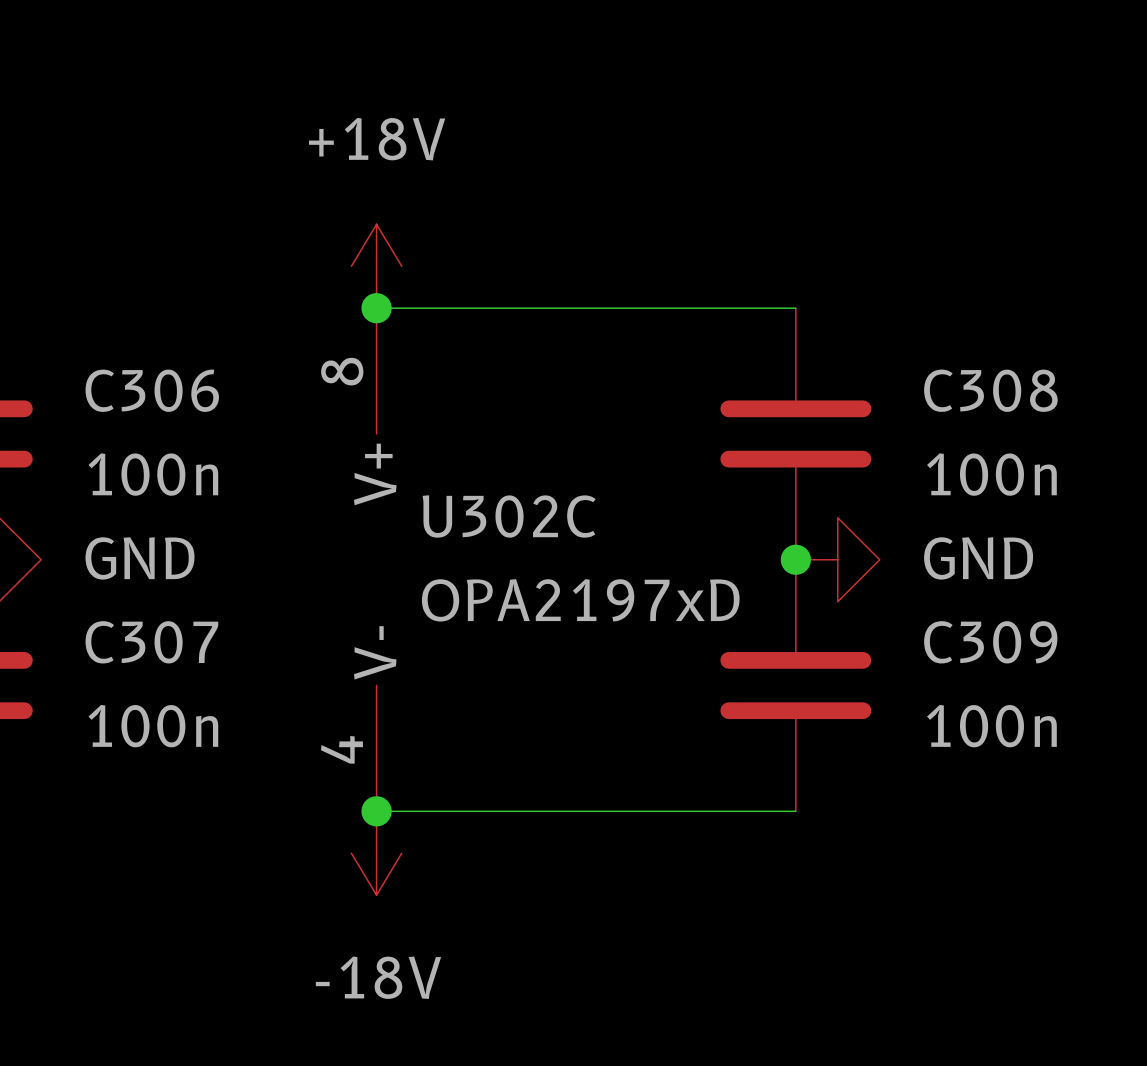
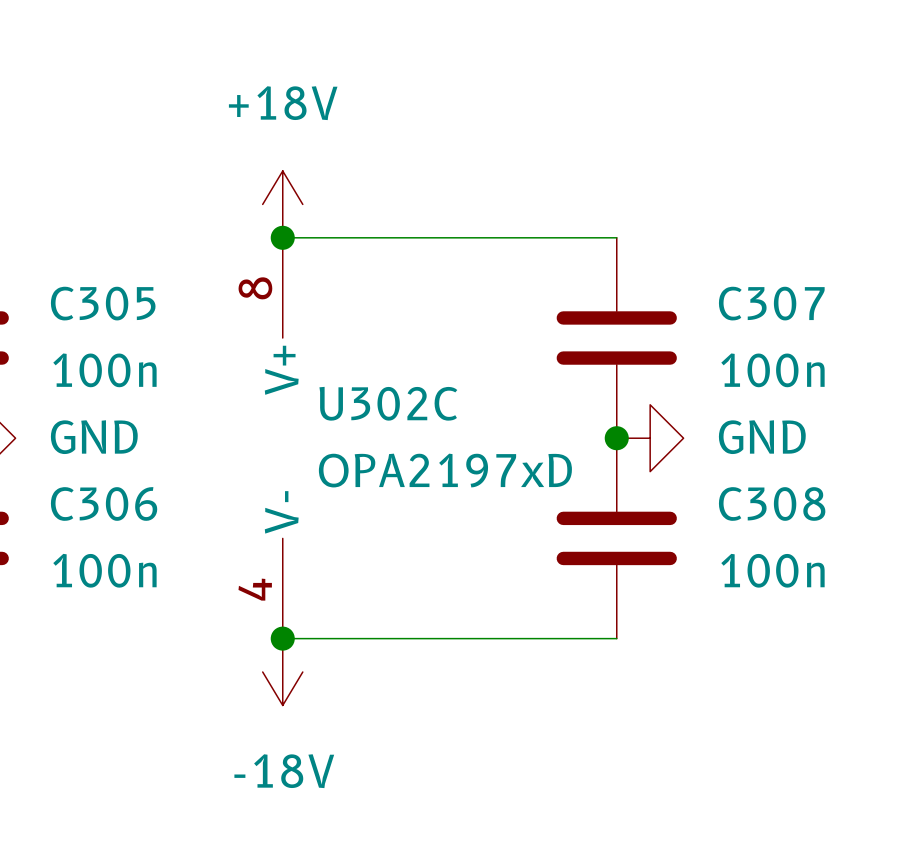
C306 name: C306 (152, 390) -> C305 (103, 303)
C308 name: C308 (990, 390) -> C307 (771, 303)
C307 name: C307 (151, 642) -> C306 (104, 503)
C309 name: C309 (990, 642) -> C308 (772, 503)

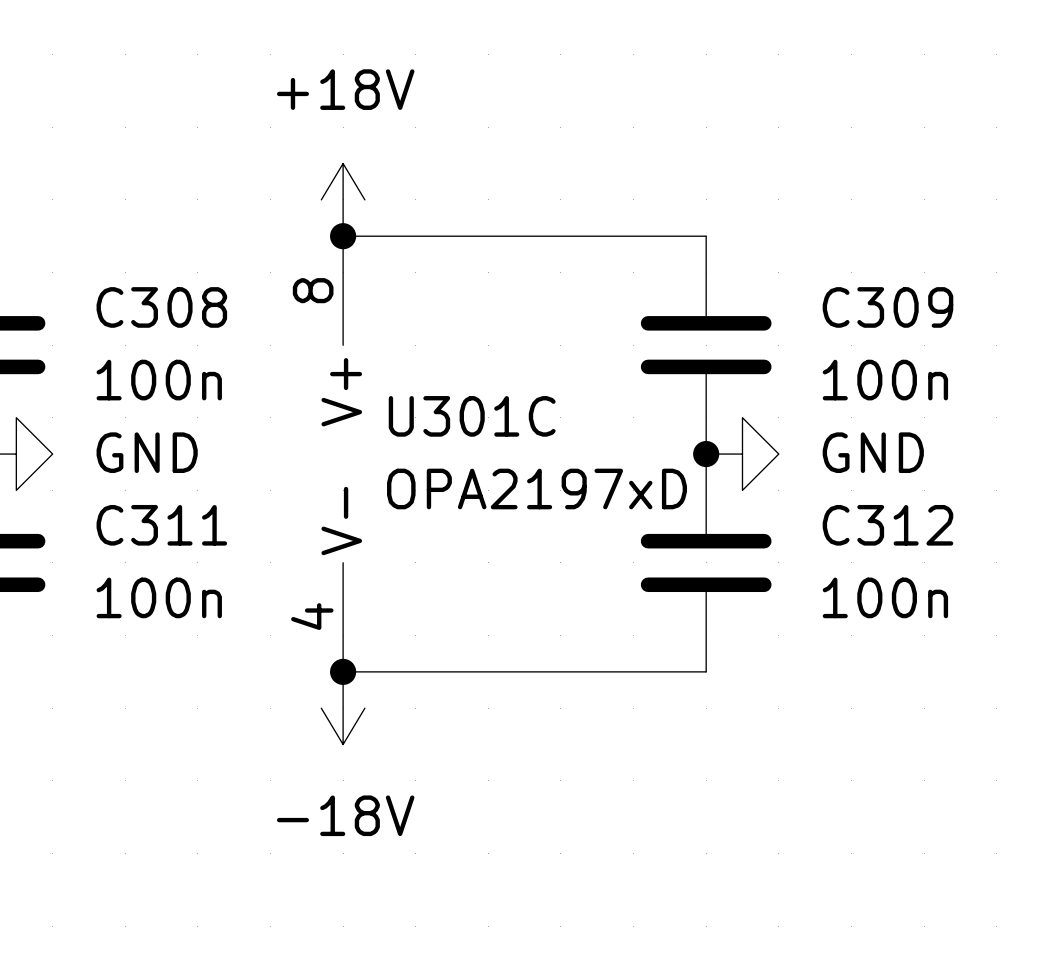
C305 name: C305 (103, 303) -> C308 (161, 307)
C307 name: C307 (771, 303) -> C309 (887, 307)
U302C name: U302C (388, 403) -> U301C (472, 416)
C306 name: C306 (104, 503) -> C311 (161, 525)
C308 name: C308 (772, 503) -> C312 (887, 525)

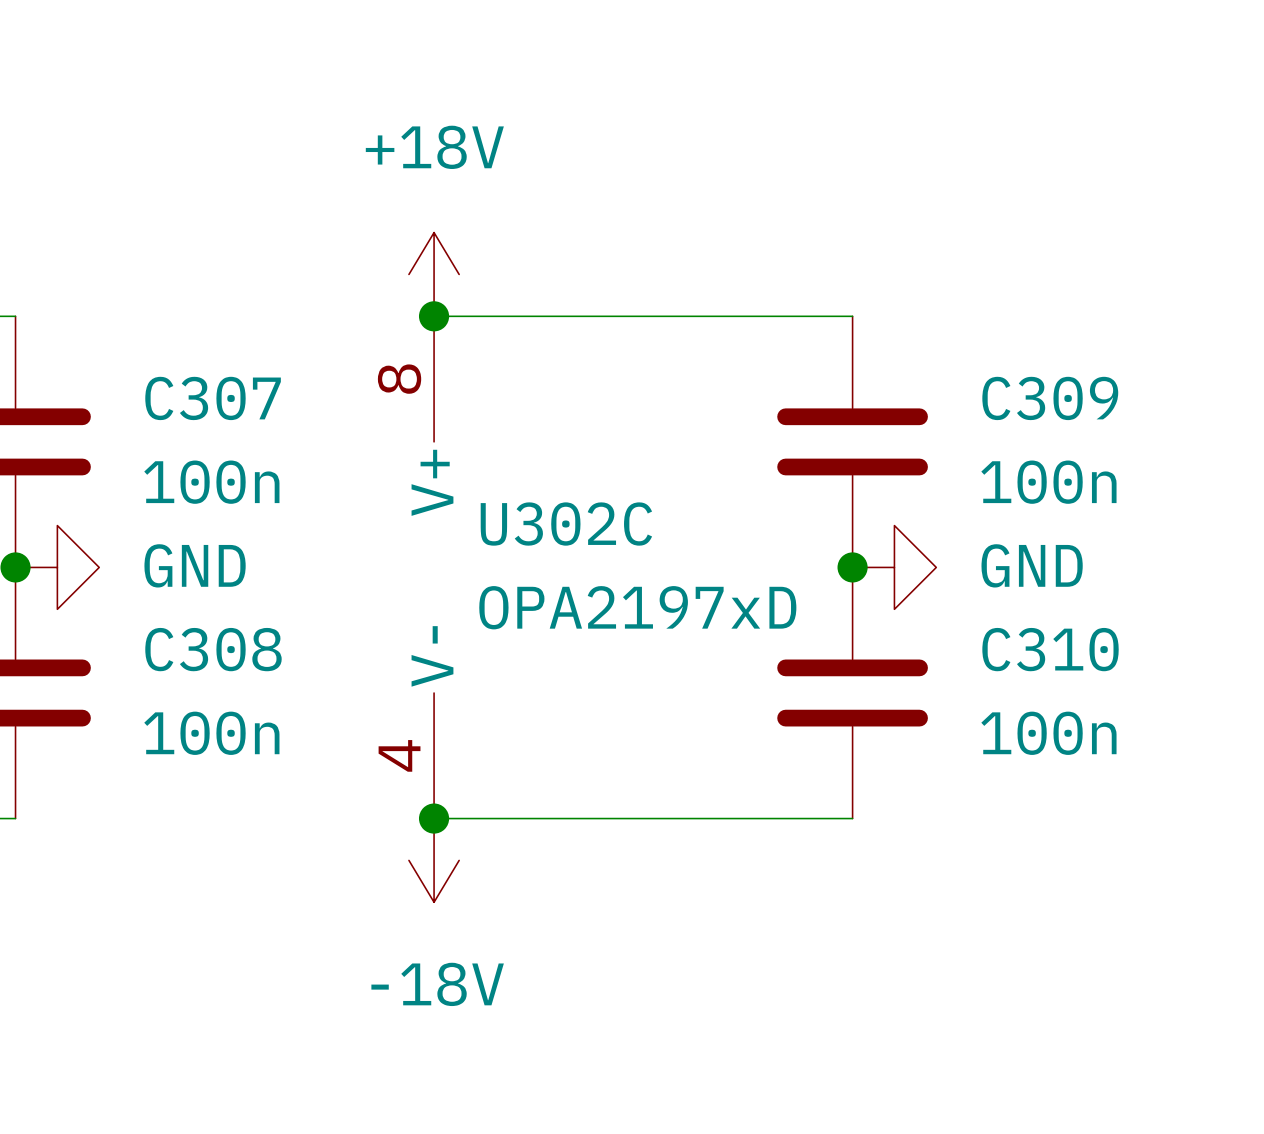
C308 name: C308 (161, 307) -> C307 (213, 398)
U301C name: U301C (472, 416) -> U302C (566, 524)
C311 name: C311 (161, 525) -> C308 (213, 649)
C312 name: C312 (887, 525) -> C310 (1050, 649)

